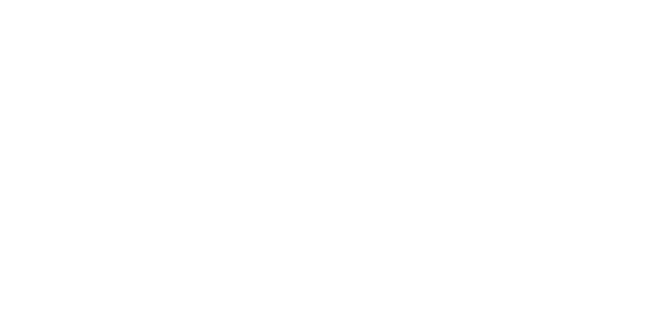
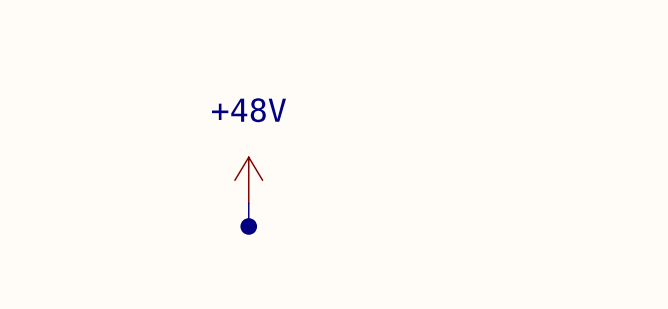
power symbol: none -> +48V (248, 180)
wire: none -> (248, 203) (248, 226)
junction: none -> (248, 226)

